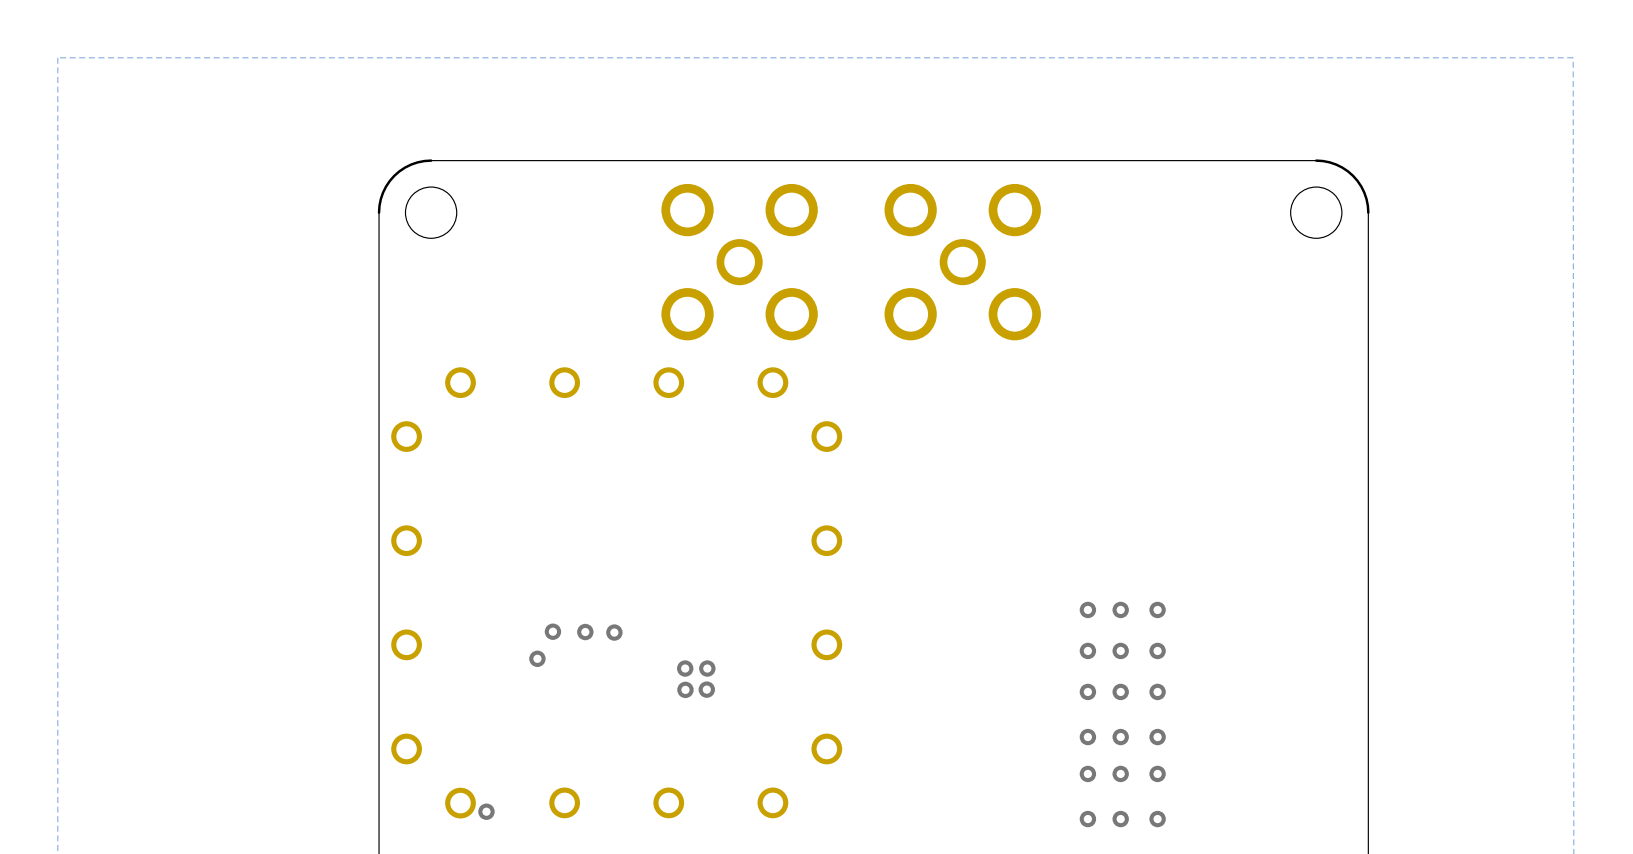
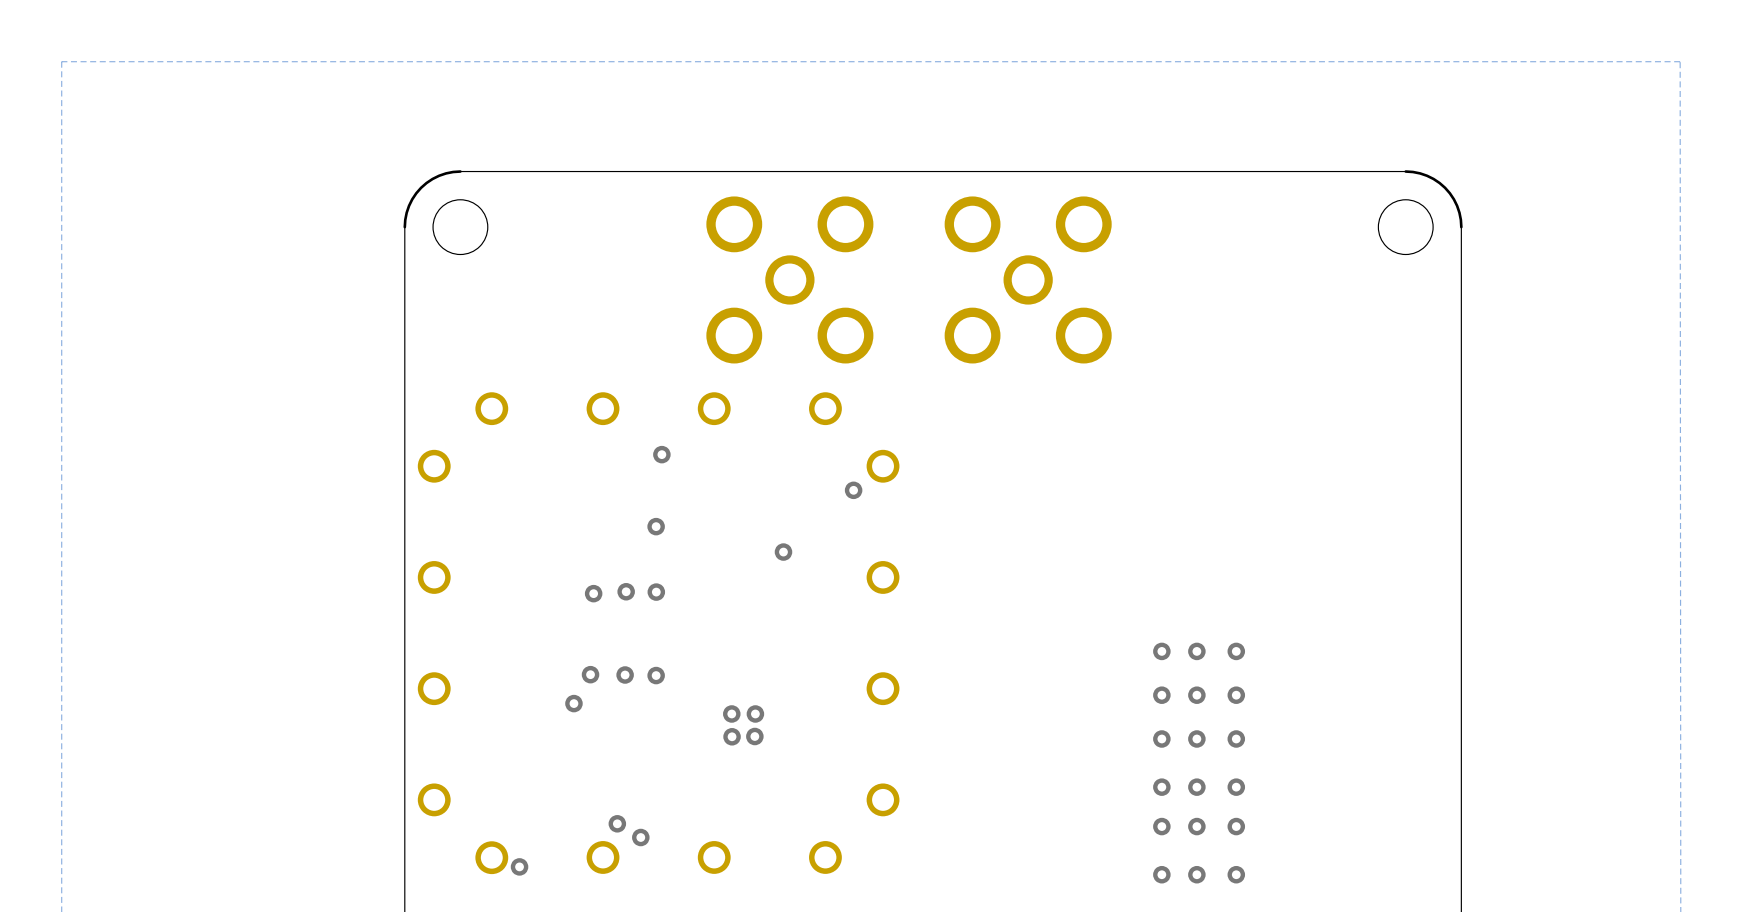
via: none -> (661, 454)
via: none -> (853, 490)
via: none -> (656, 526)
via: none -> (783, 552)
via: none -> (626, 591)
via: none -> (656, 592)
via: none -> (593, 593)
via: none -> (617, 823)
via: none -> (640, 837)

